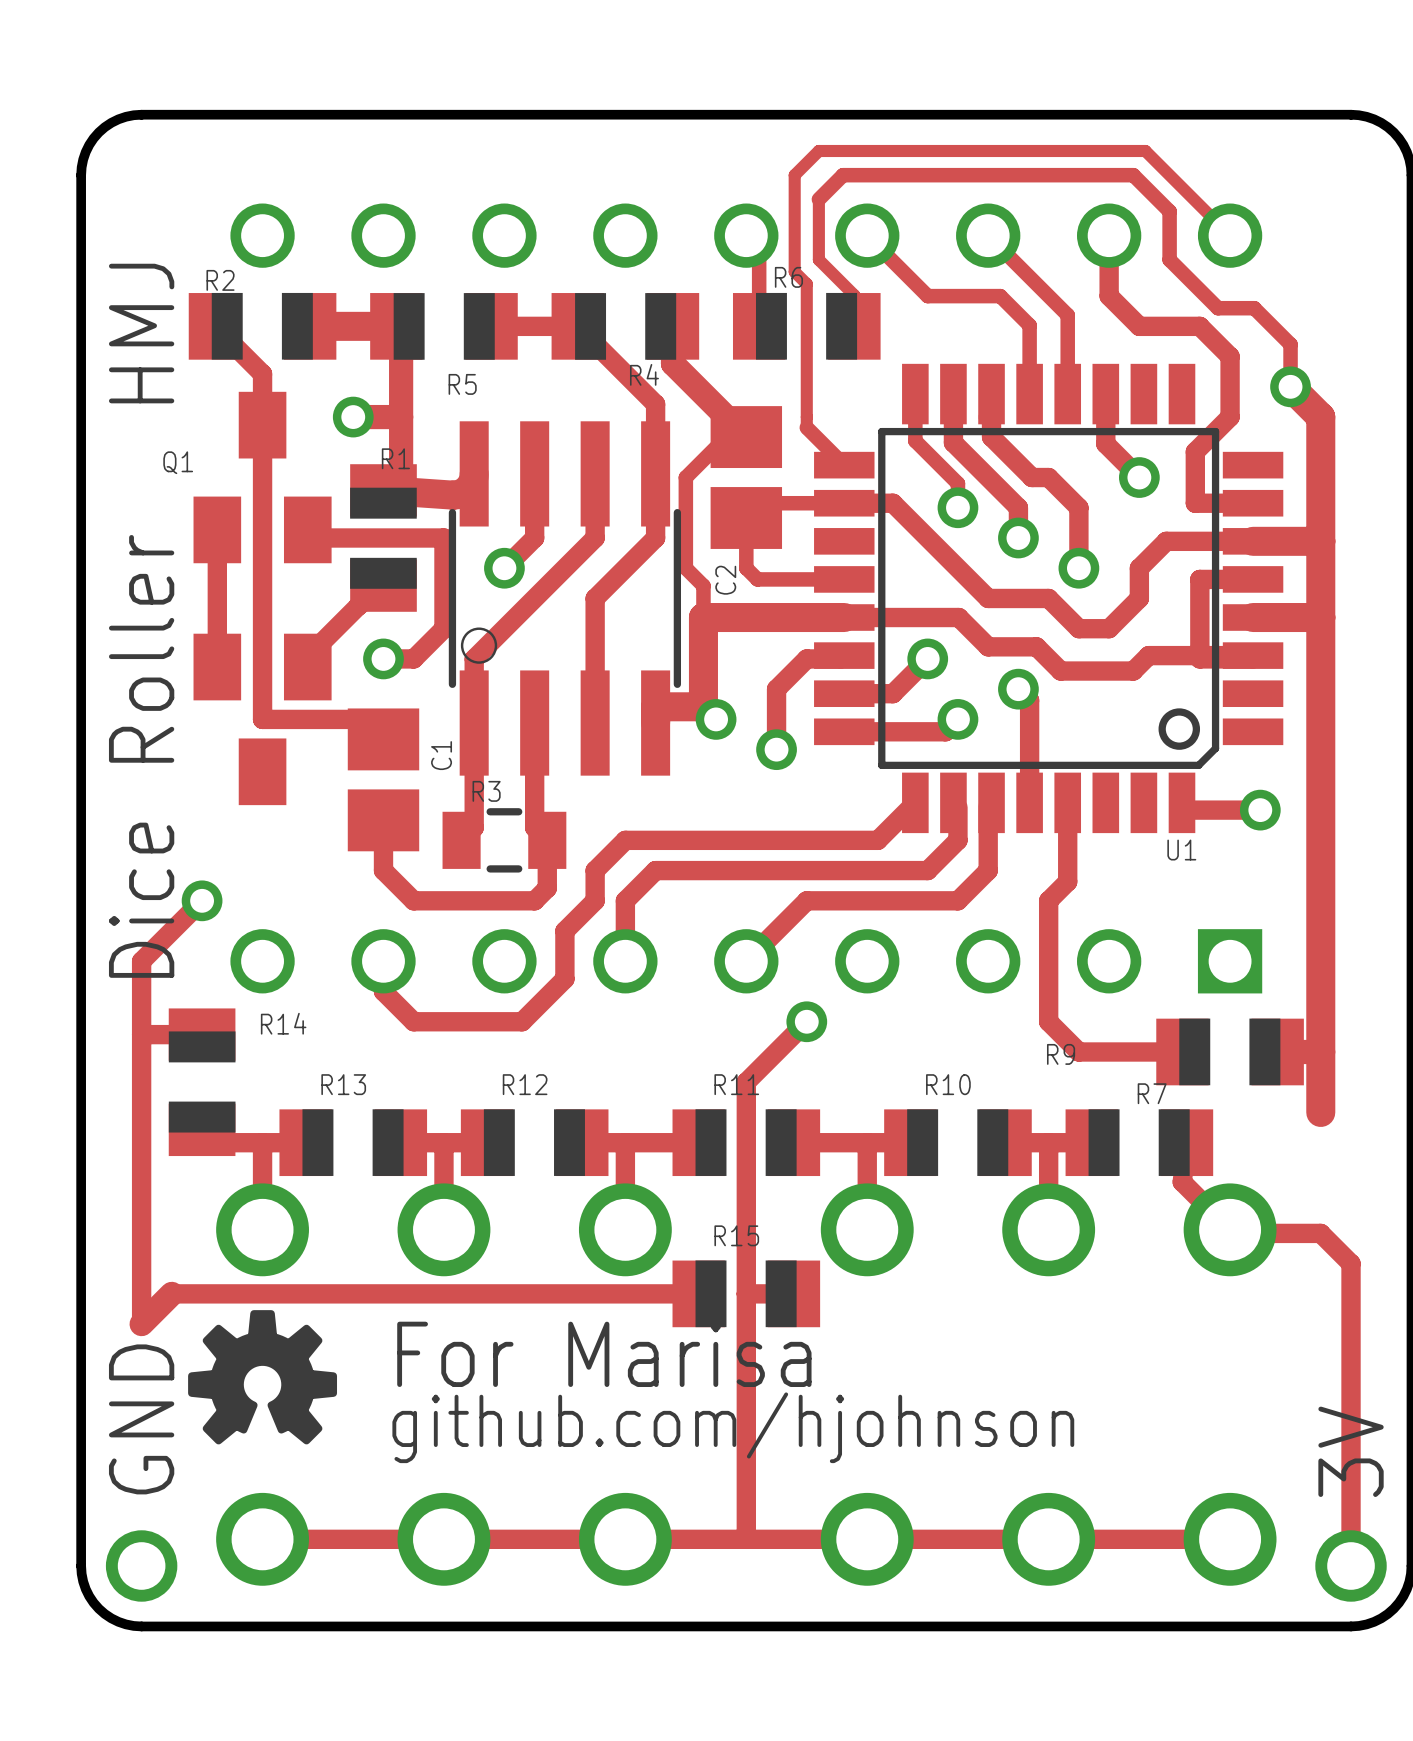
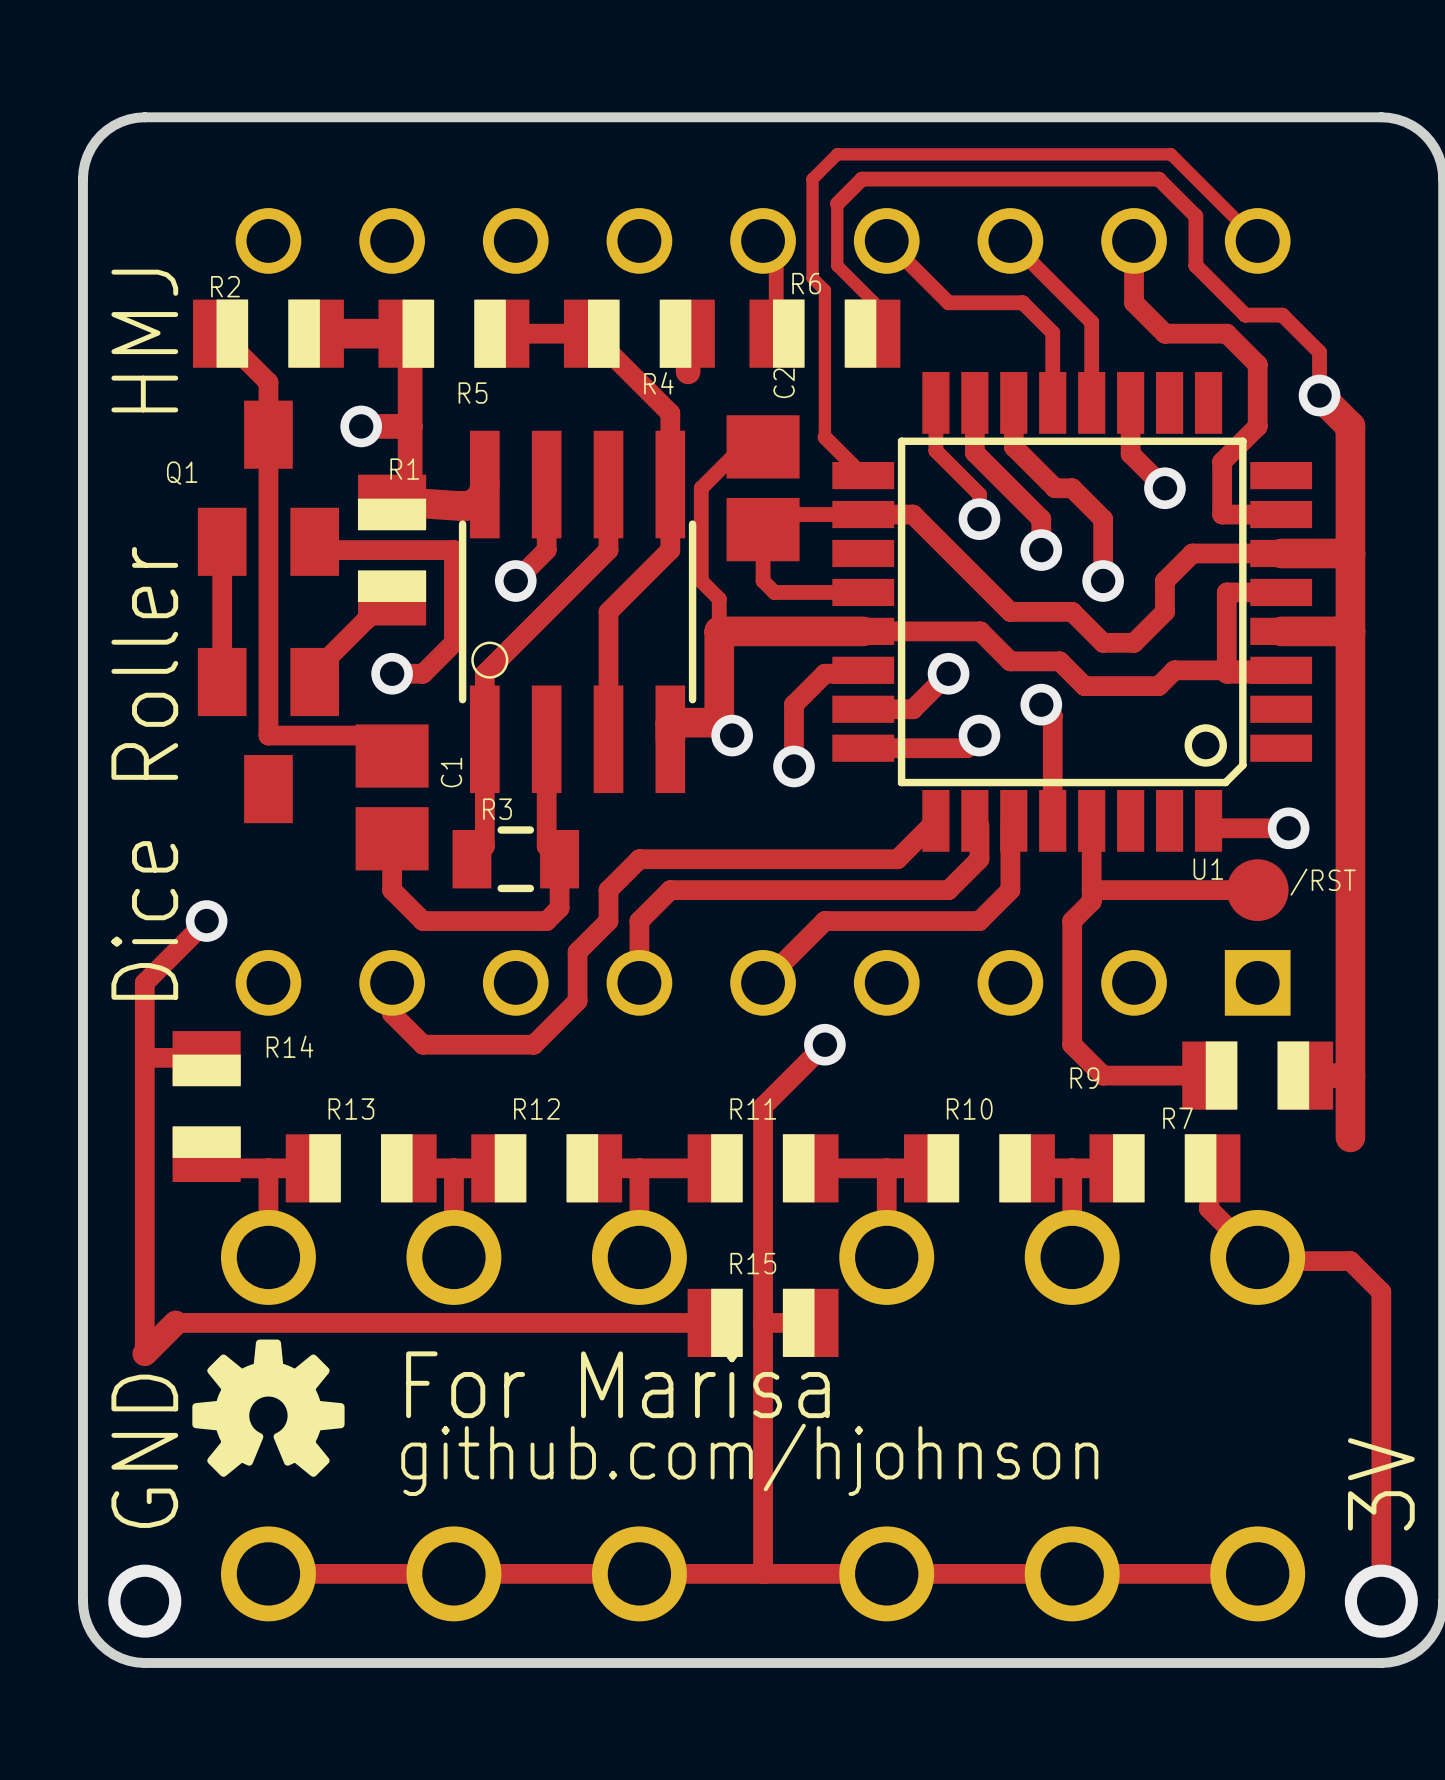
track: (672, 363) (746, 437) (726, 437) -> none
C2 name position: C2 (725, 580) -> C2 (784, 383)
text: none -> /RST (1323, 882)
track: none -> (1091, 890) (1257, 890)
part: none -> (1257, 890)

